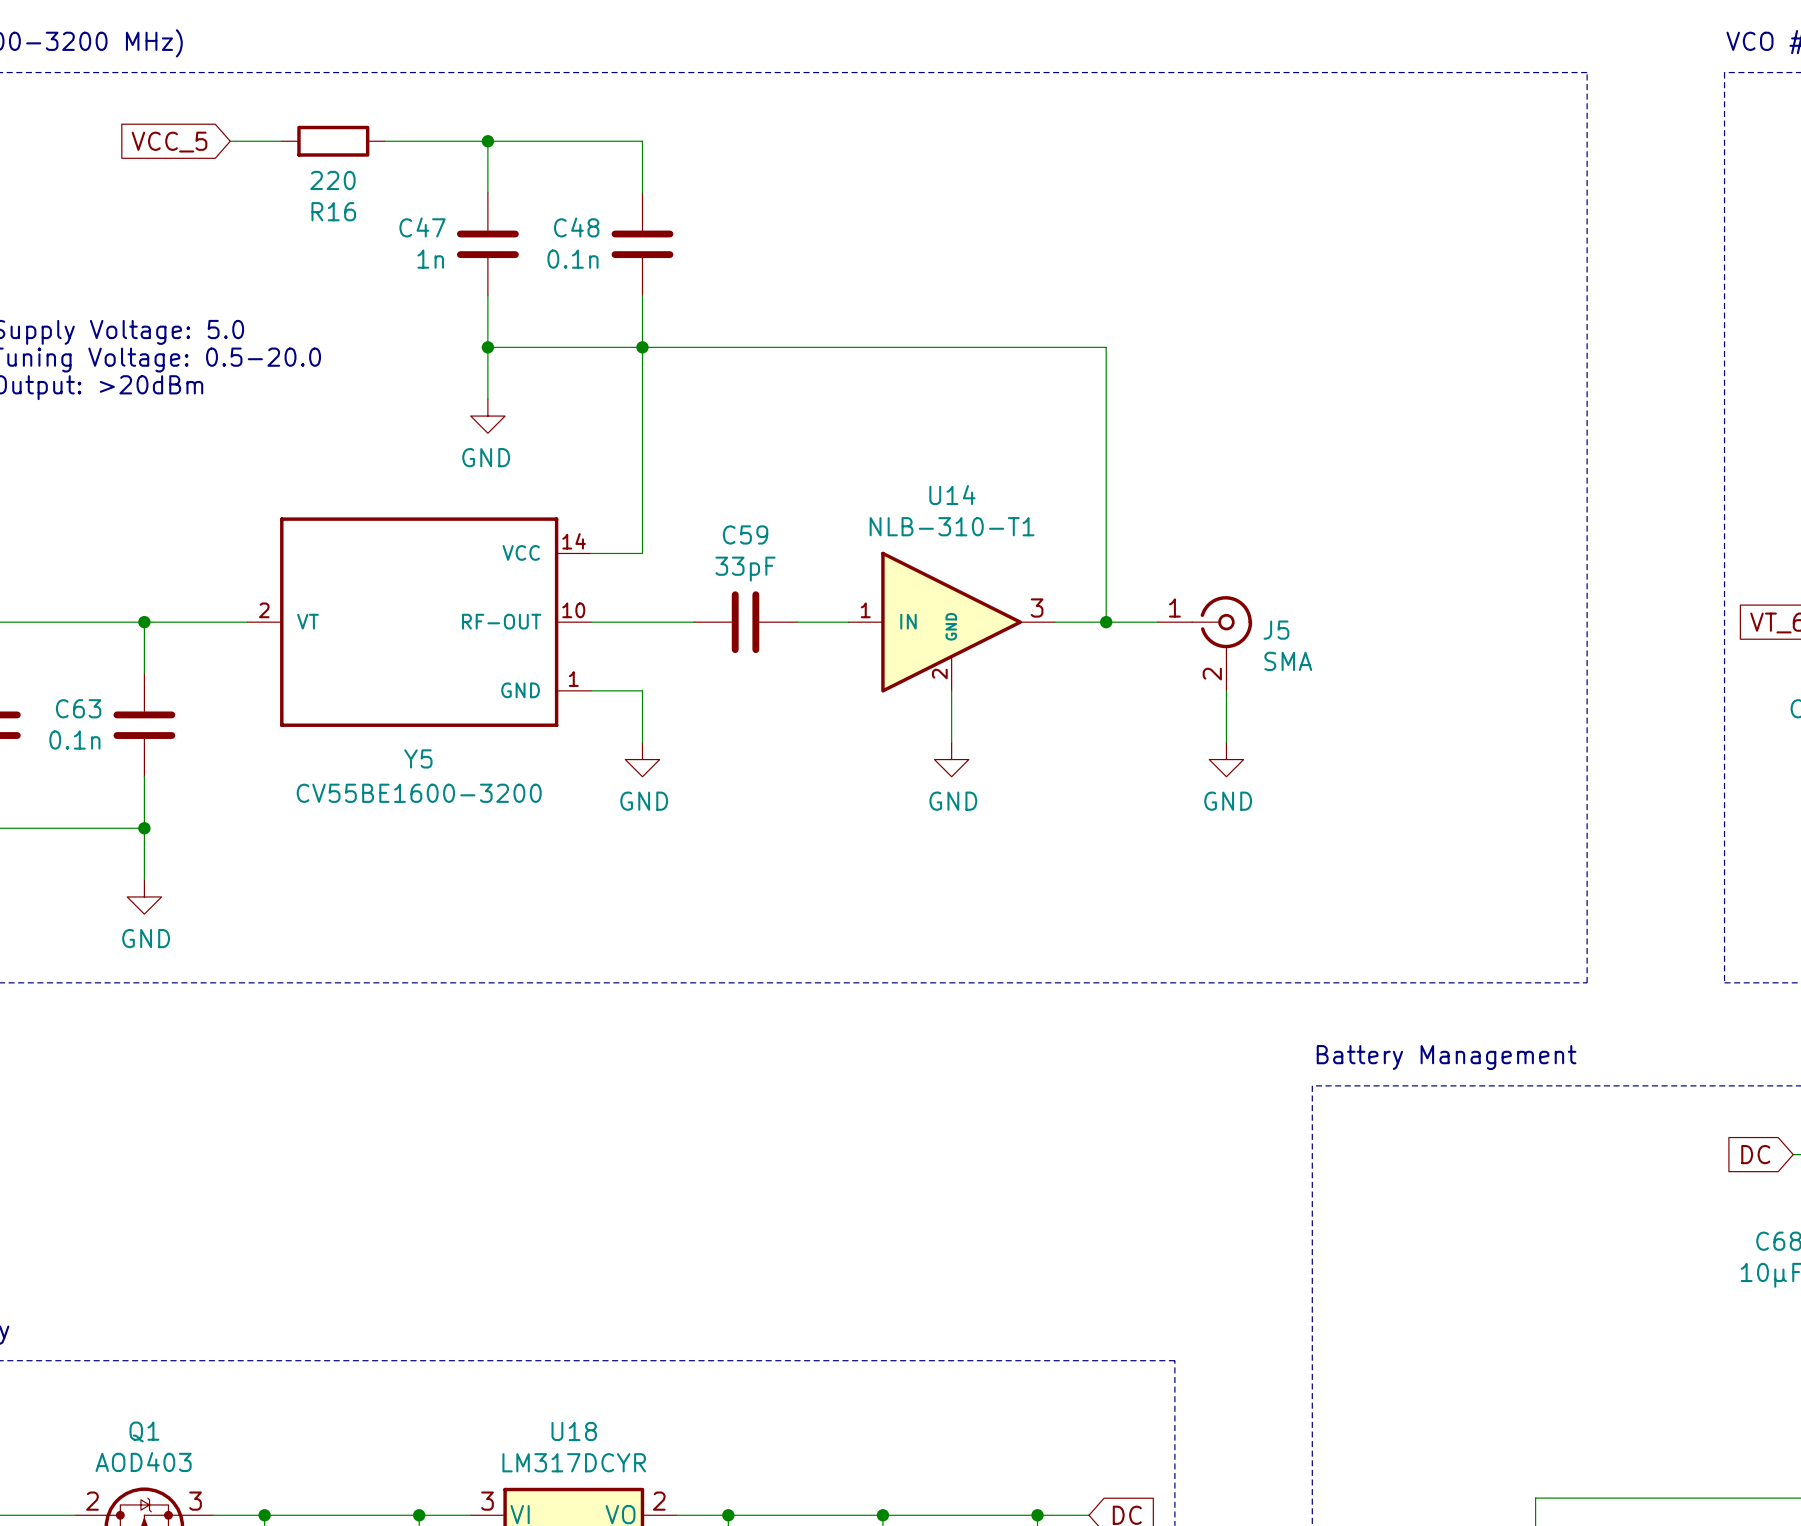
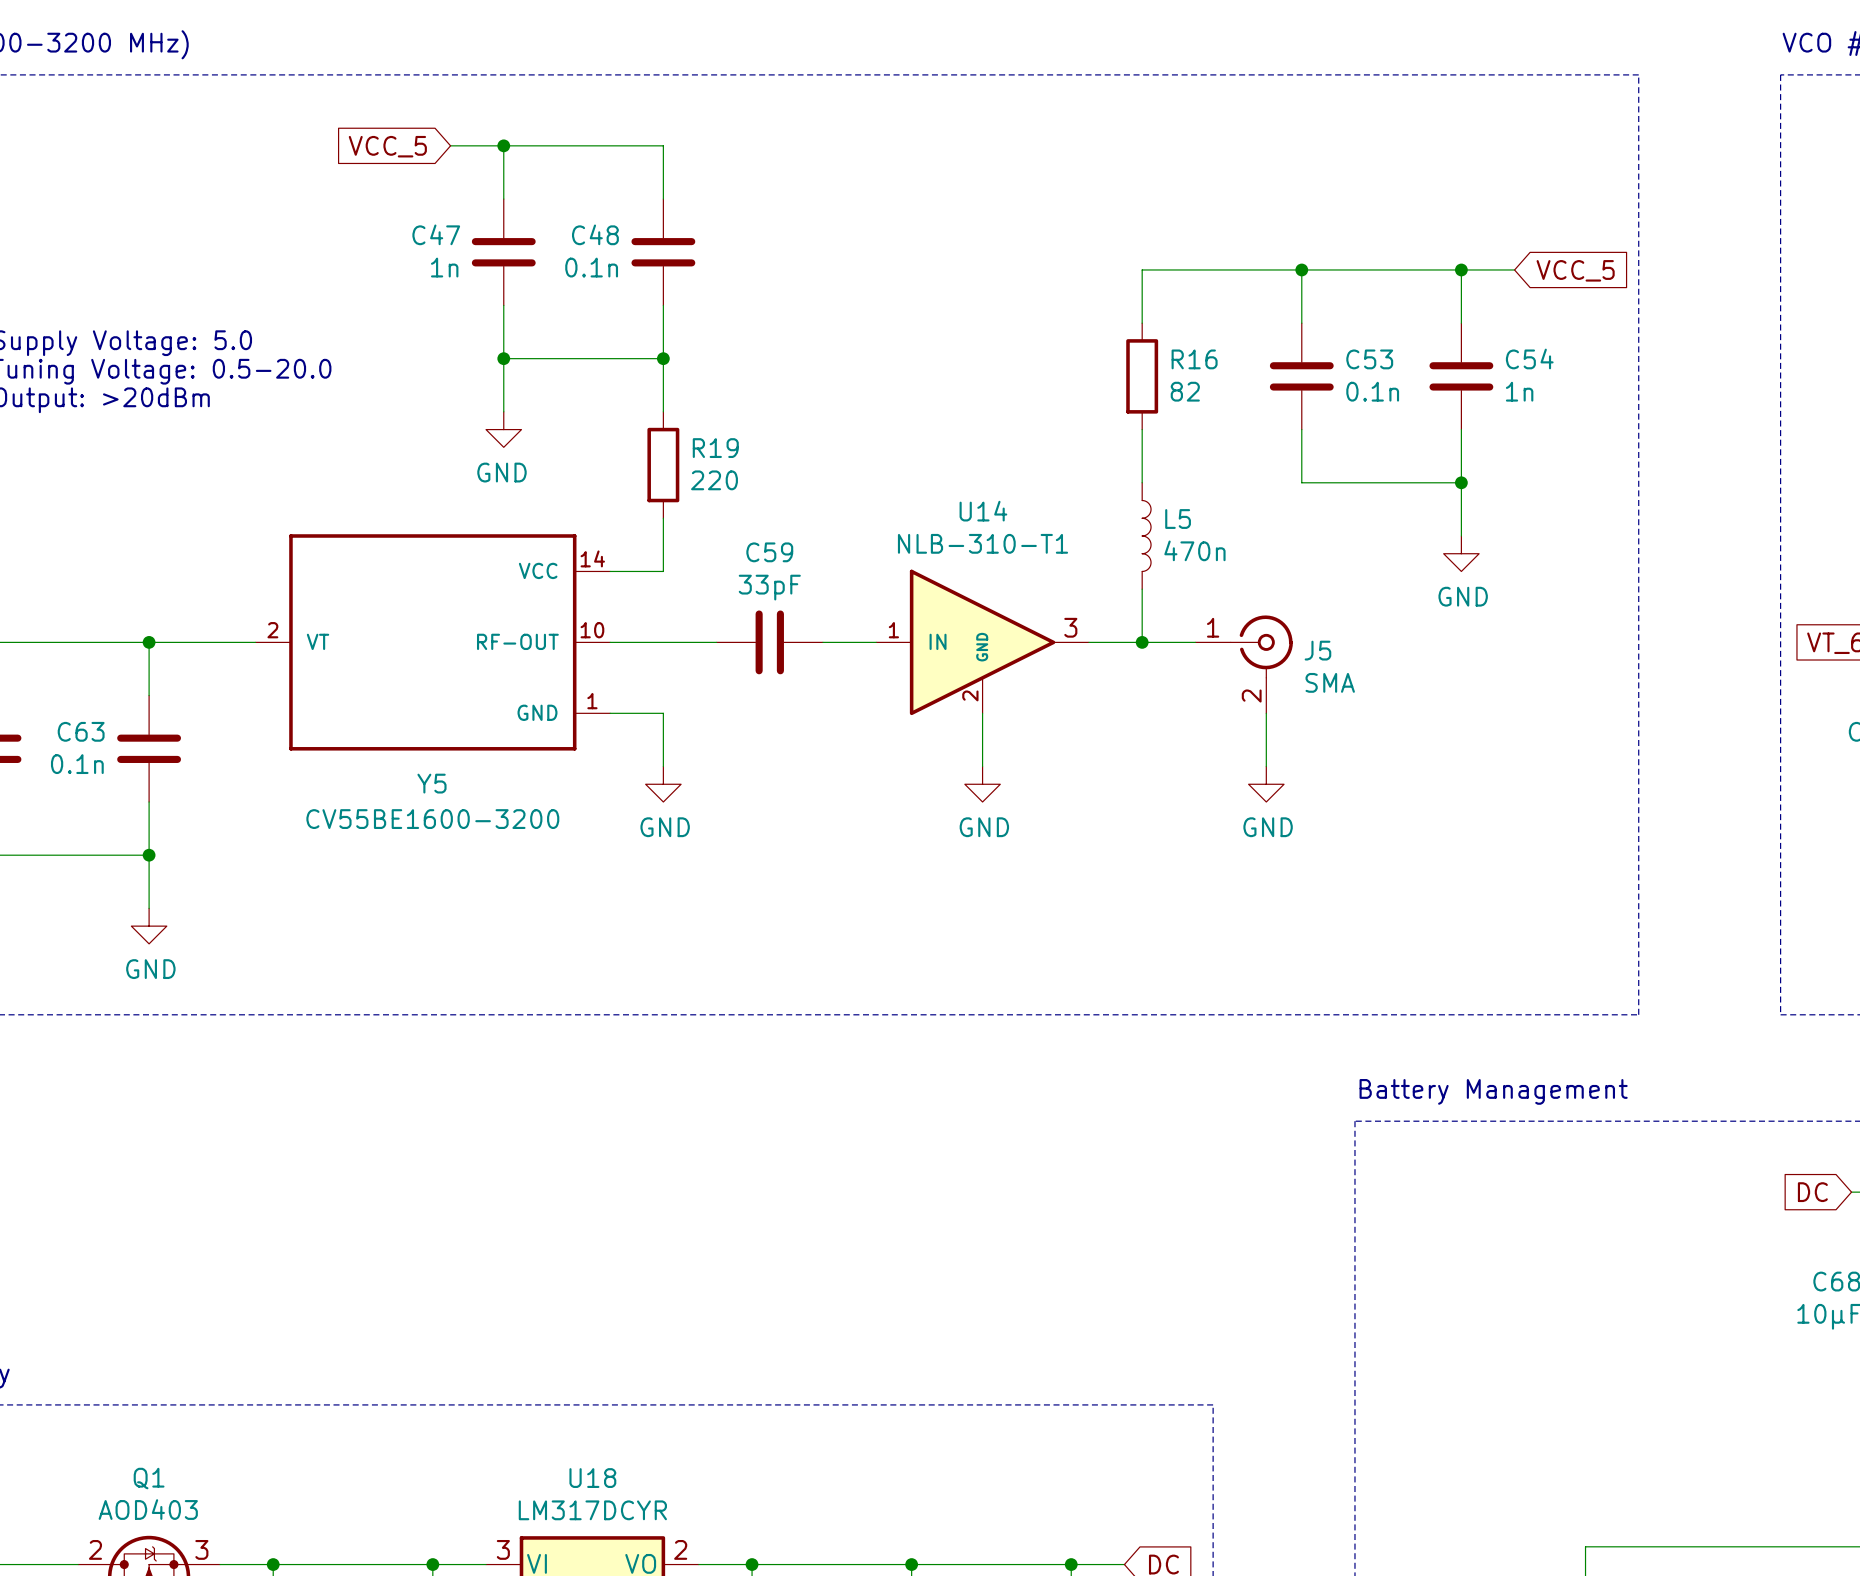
wire: (230, 141) (281, 141) -> none
R16 rotation: 0° (333, 141) -> 90° clockwise (1142, 376)
R16 position: (333, 141) -> (1142, 376)
wire: (384, 141) (436, 141) -> none
global label position: VCC_5 (169, 142) -> VCC_5 (387, 146)
R16 value: 220 (332, 180) -> 82 (1185, 391)
R16 name position: R16 (333, 211) -> R16 (1194, 359)
wire: none -> (1301, 269) (1301, 323)
junction: none -> (1301, 269)
wire: none -> (1461, 269) (1461, 323)
junction: none -> (1461, 269)
wire: none -> (1514, 269) (1142, 269) (1142, 323)
global label: none -> VCC_5 (1575, 270)
wire: (642, 347) (1106, 347) (1106, 416) -> none
C53: none -> 0.1n (1301, 376)
C54: none -> 1n (1461, 376)
wire: (642, 398) (642, 501) -> none
wire: none -> (1301, 429) (1301, 482) (1461, 482)
R19: none -> 220 (663, 465)
wire: (1106, 467) (1106, 570) -> (1461, 429) (1461, 535)
junction: none -> (1461, 482)
L5: none -> 470n (1146, 535)
power symbol: none -> GND (1461, 553)

